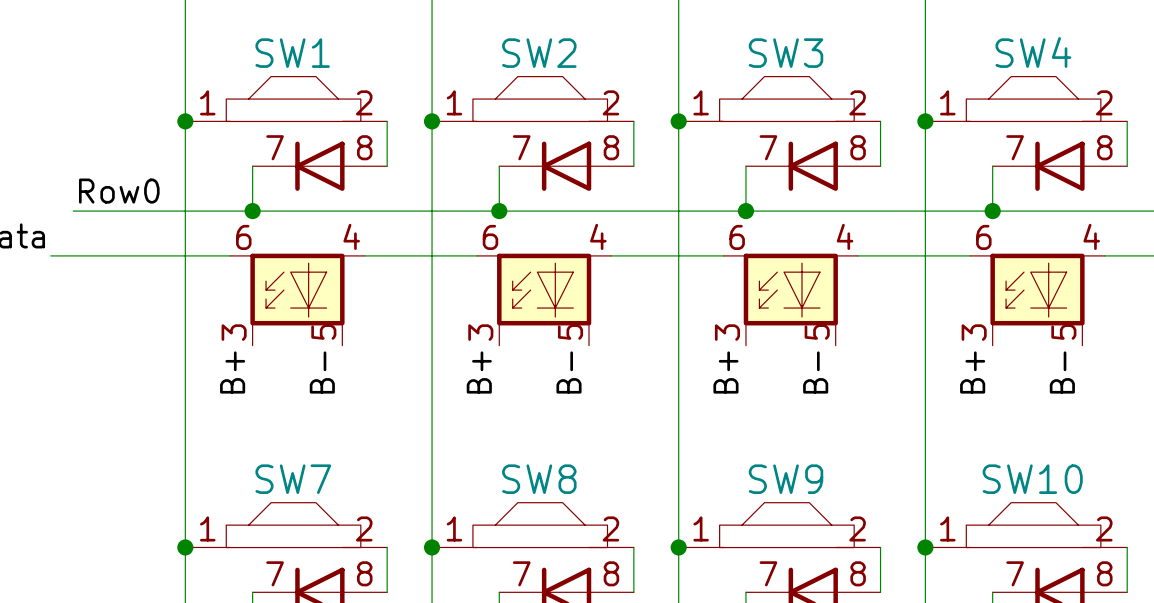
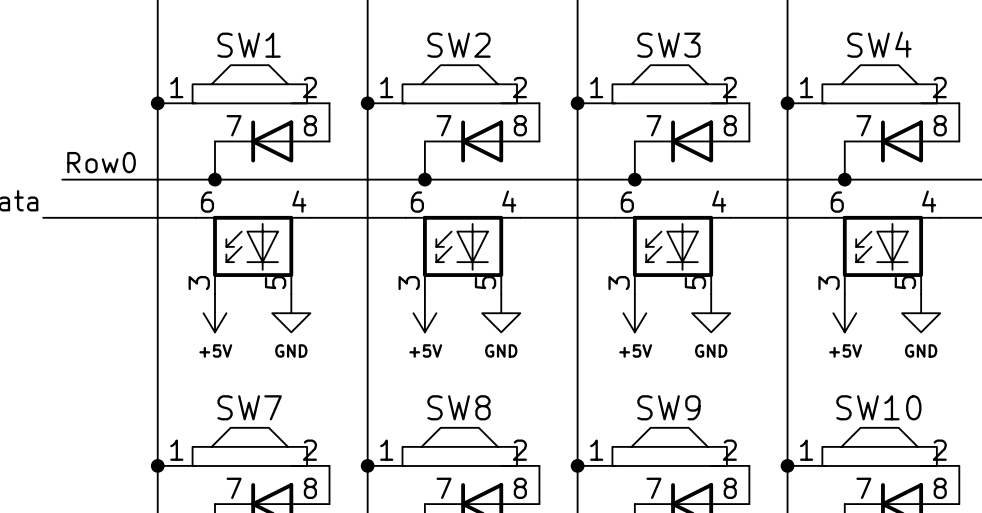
power symbol: none -> +5V (214, 313)
power symbol: none -> GND (291, 313)
power symbol: none -> +5V (424, 313)
power symbol: none -> GND (501, 313)
power symbol: none -> +5V (634, 313)
power symbol: none -> GND (711, 313)
power symbol: none -> +5V (844, 313)
power symbol: none -> GND (921, 313)
label: B+ (232, 372) -> none
label: B- (322, 372) -> none
label: B+ (479, 372) -> none
label: B- (568, 372) -> none
label: B+ (725, 372) -> none
label: B- (815, 372) -> none
label: B+ (972, 372) -> none
label: B- (1062, 372) -> none

